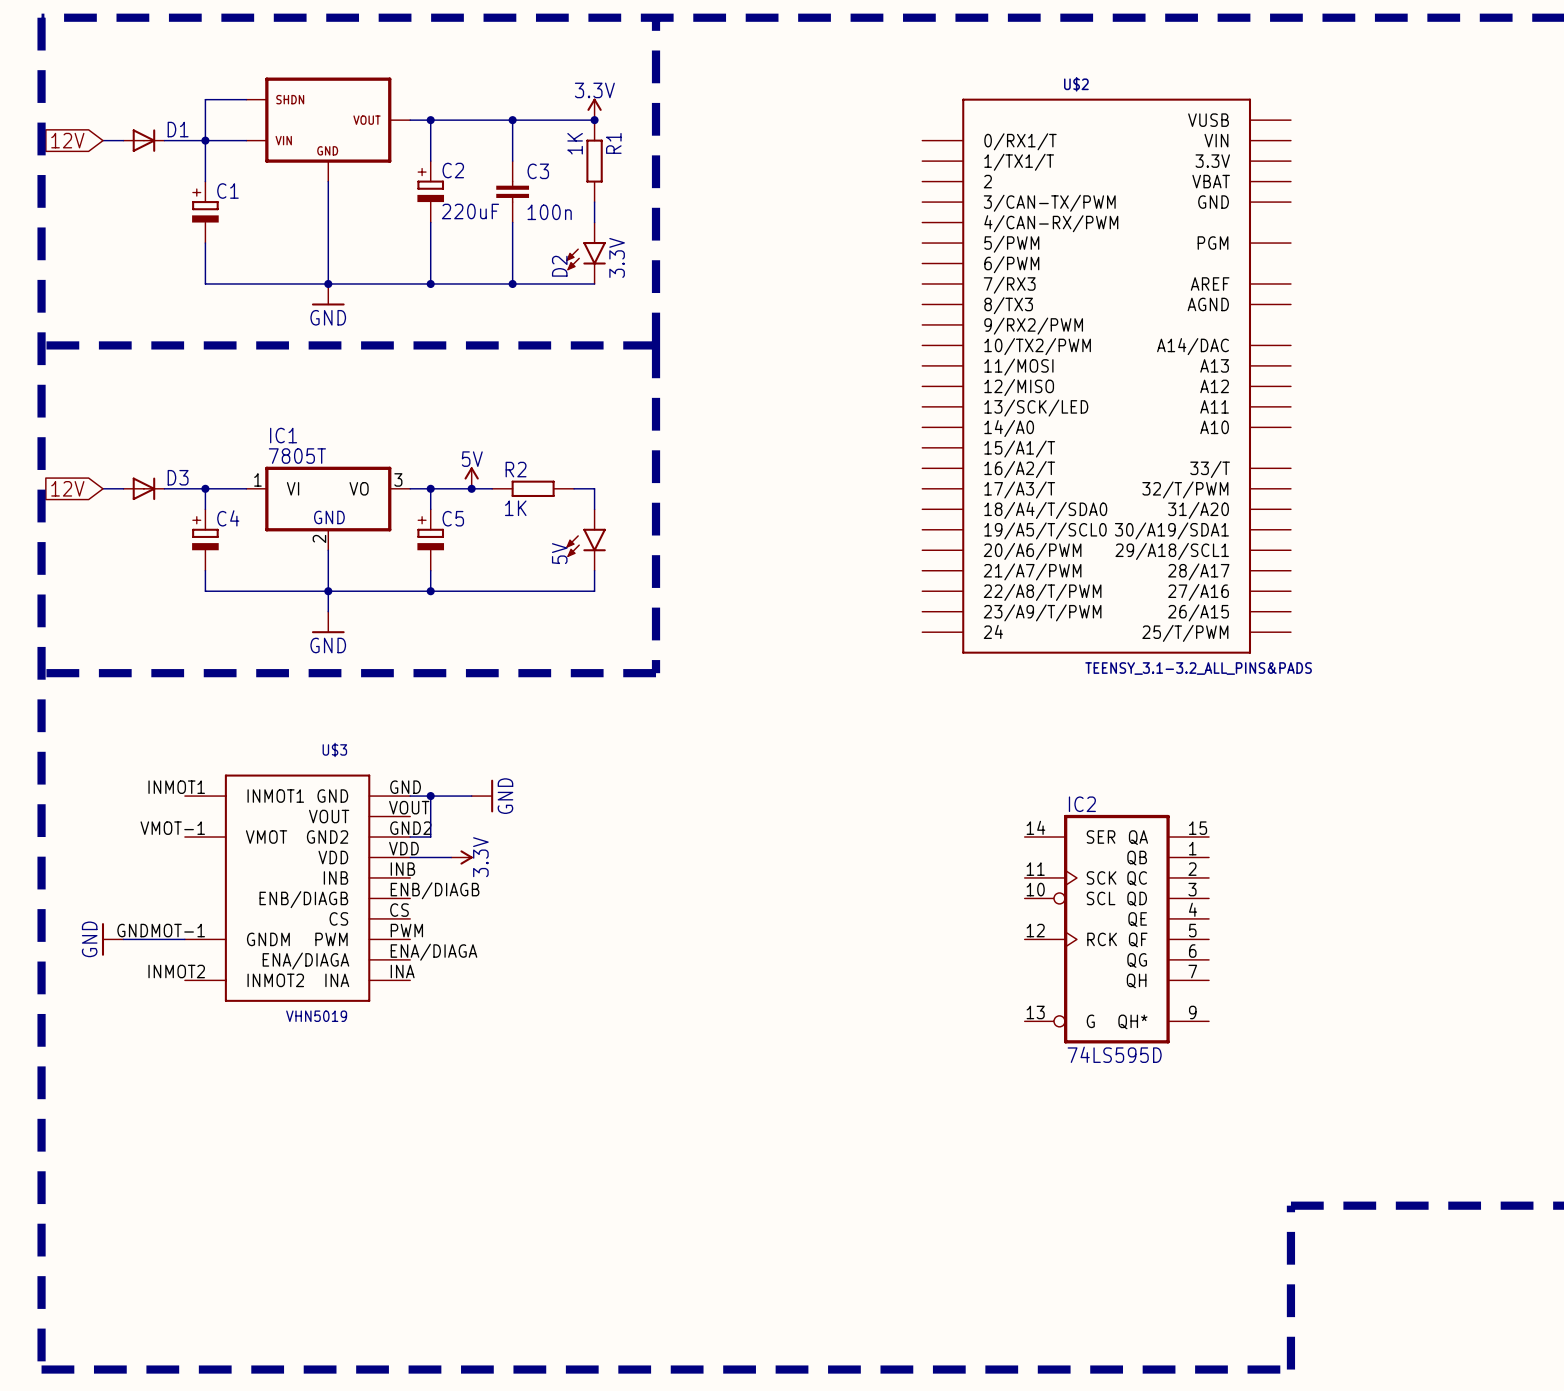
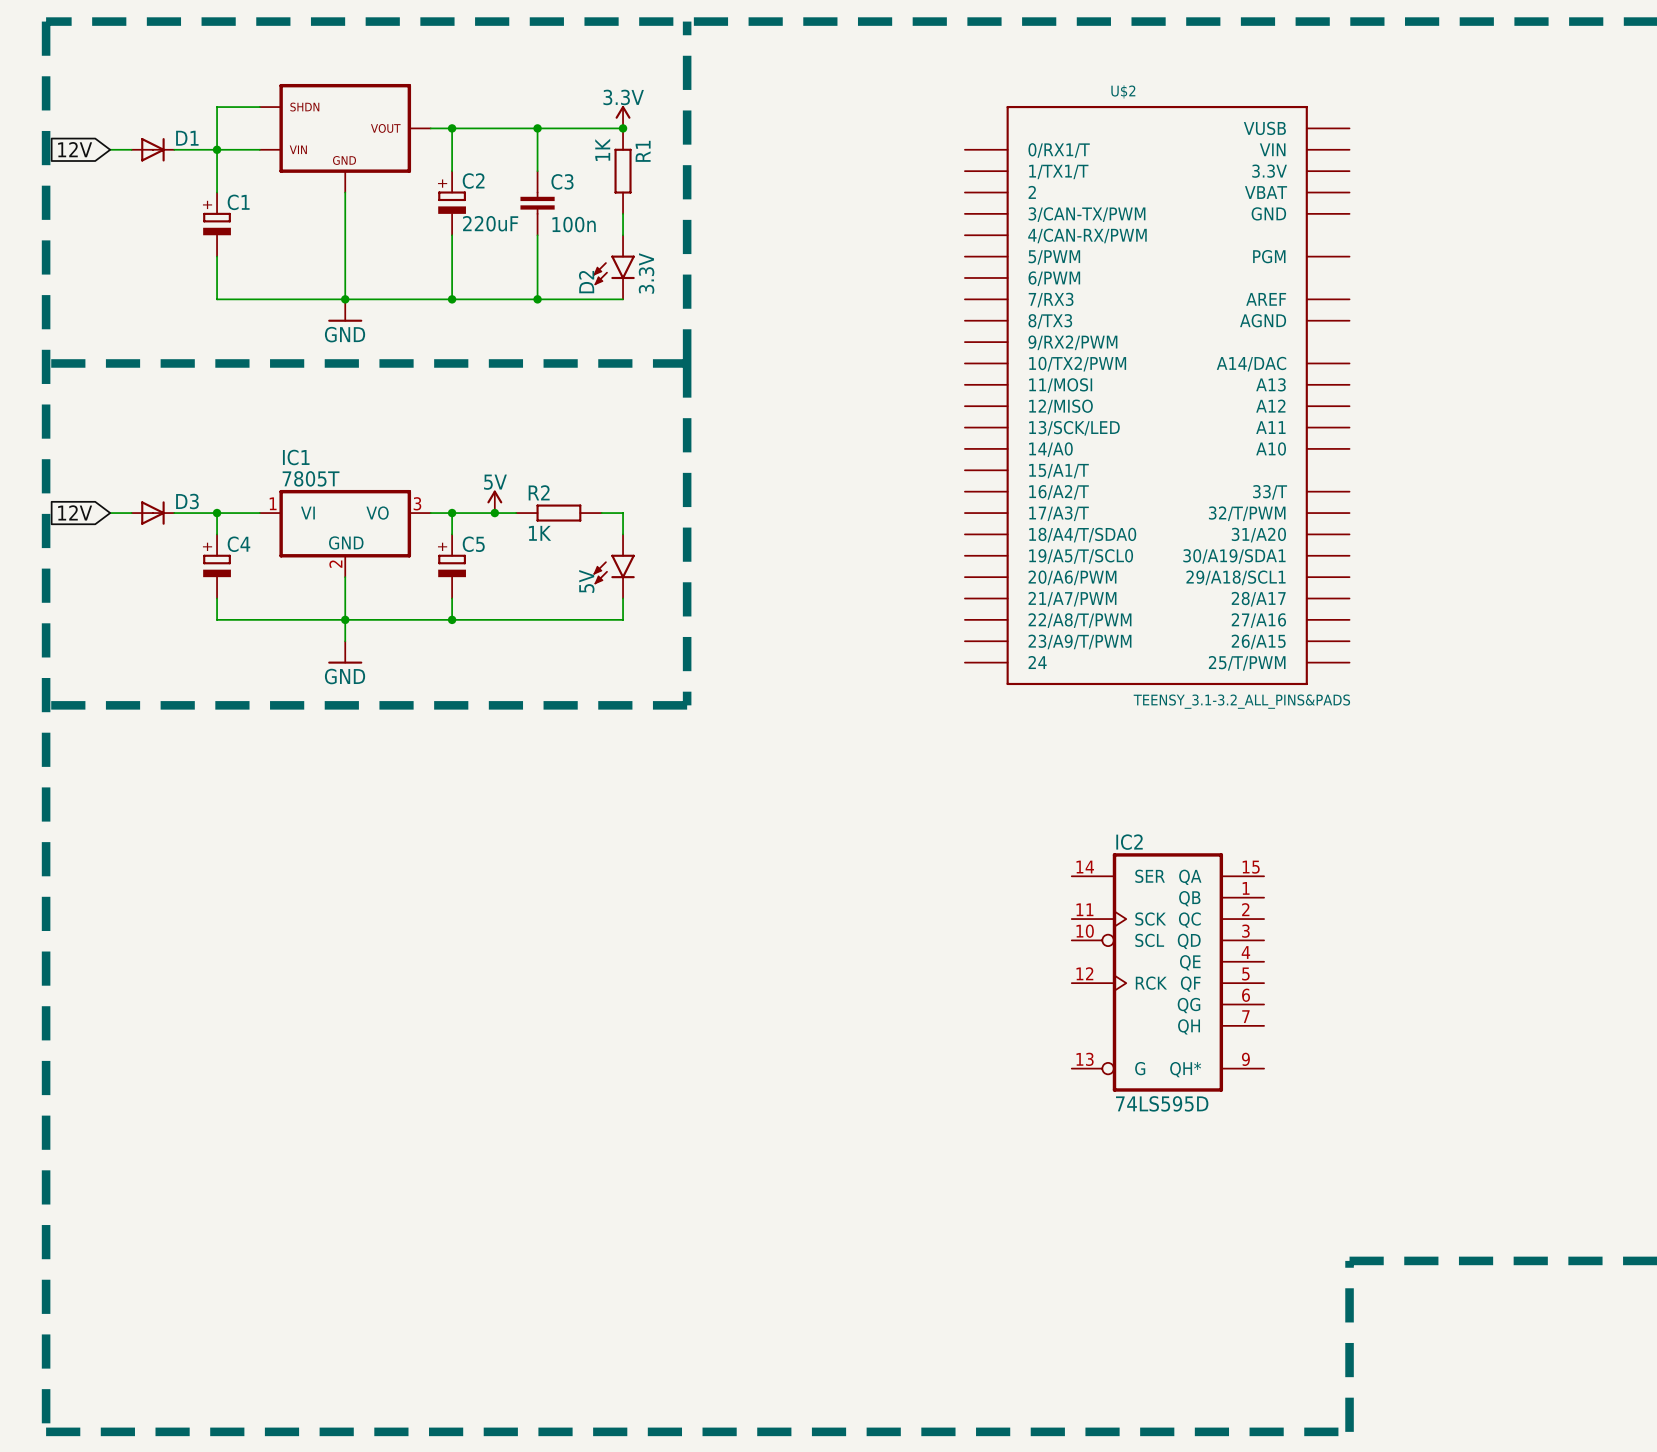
wire: (410, 796) (471, 796) -> none
wire: (430, 796) (430, 837) (410, 837) -> none
junction: (430, 796) -> none
power symbol: GND (482, 796) -> none
wire: (410, 857) (451, 857) -> none
power symbol: 3.3V (461, 857) -> none
U$3: VHN5019 (297, 888) -> none
power symbol: GND (112, 939) -> none
wire: (123, 939) (184, 939) -> none

